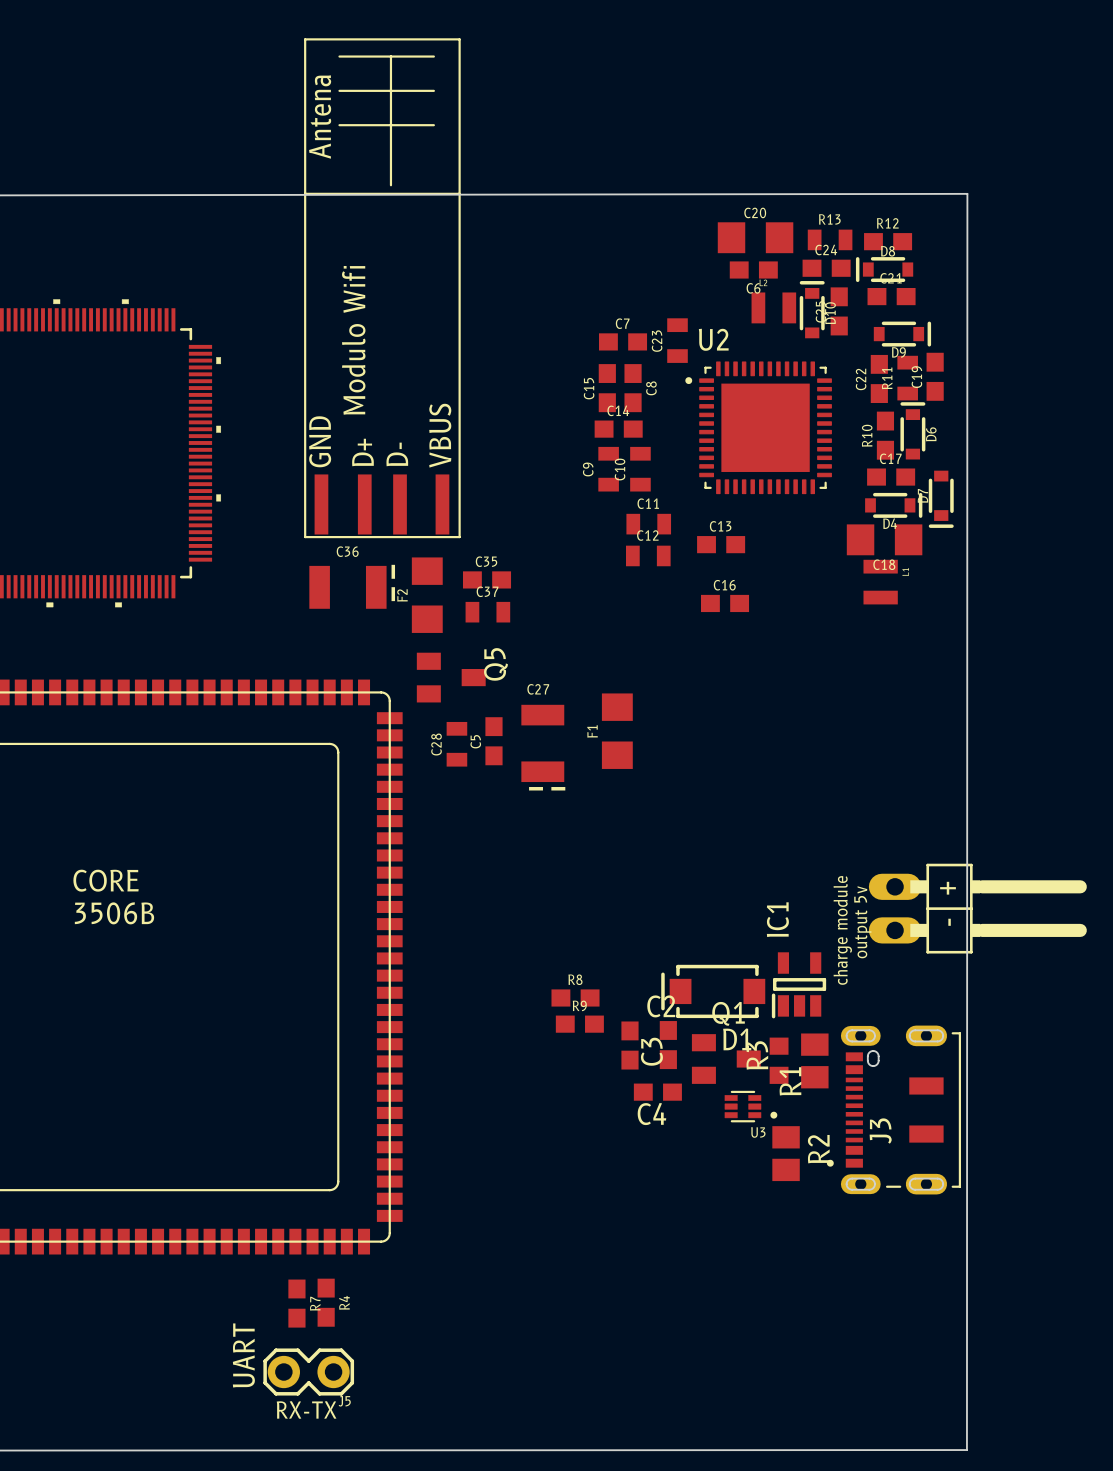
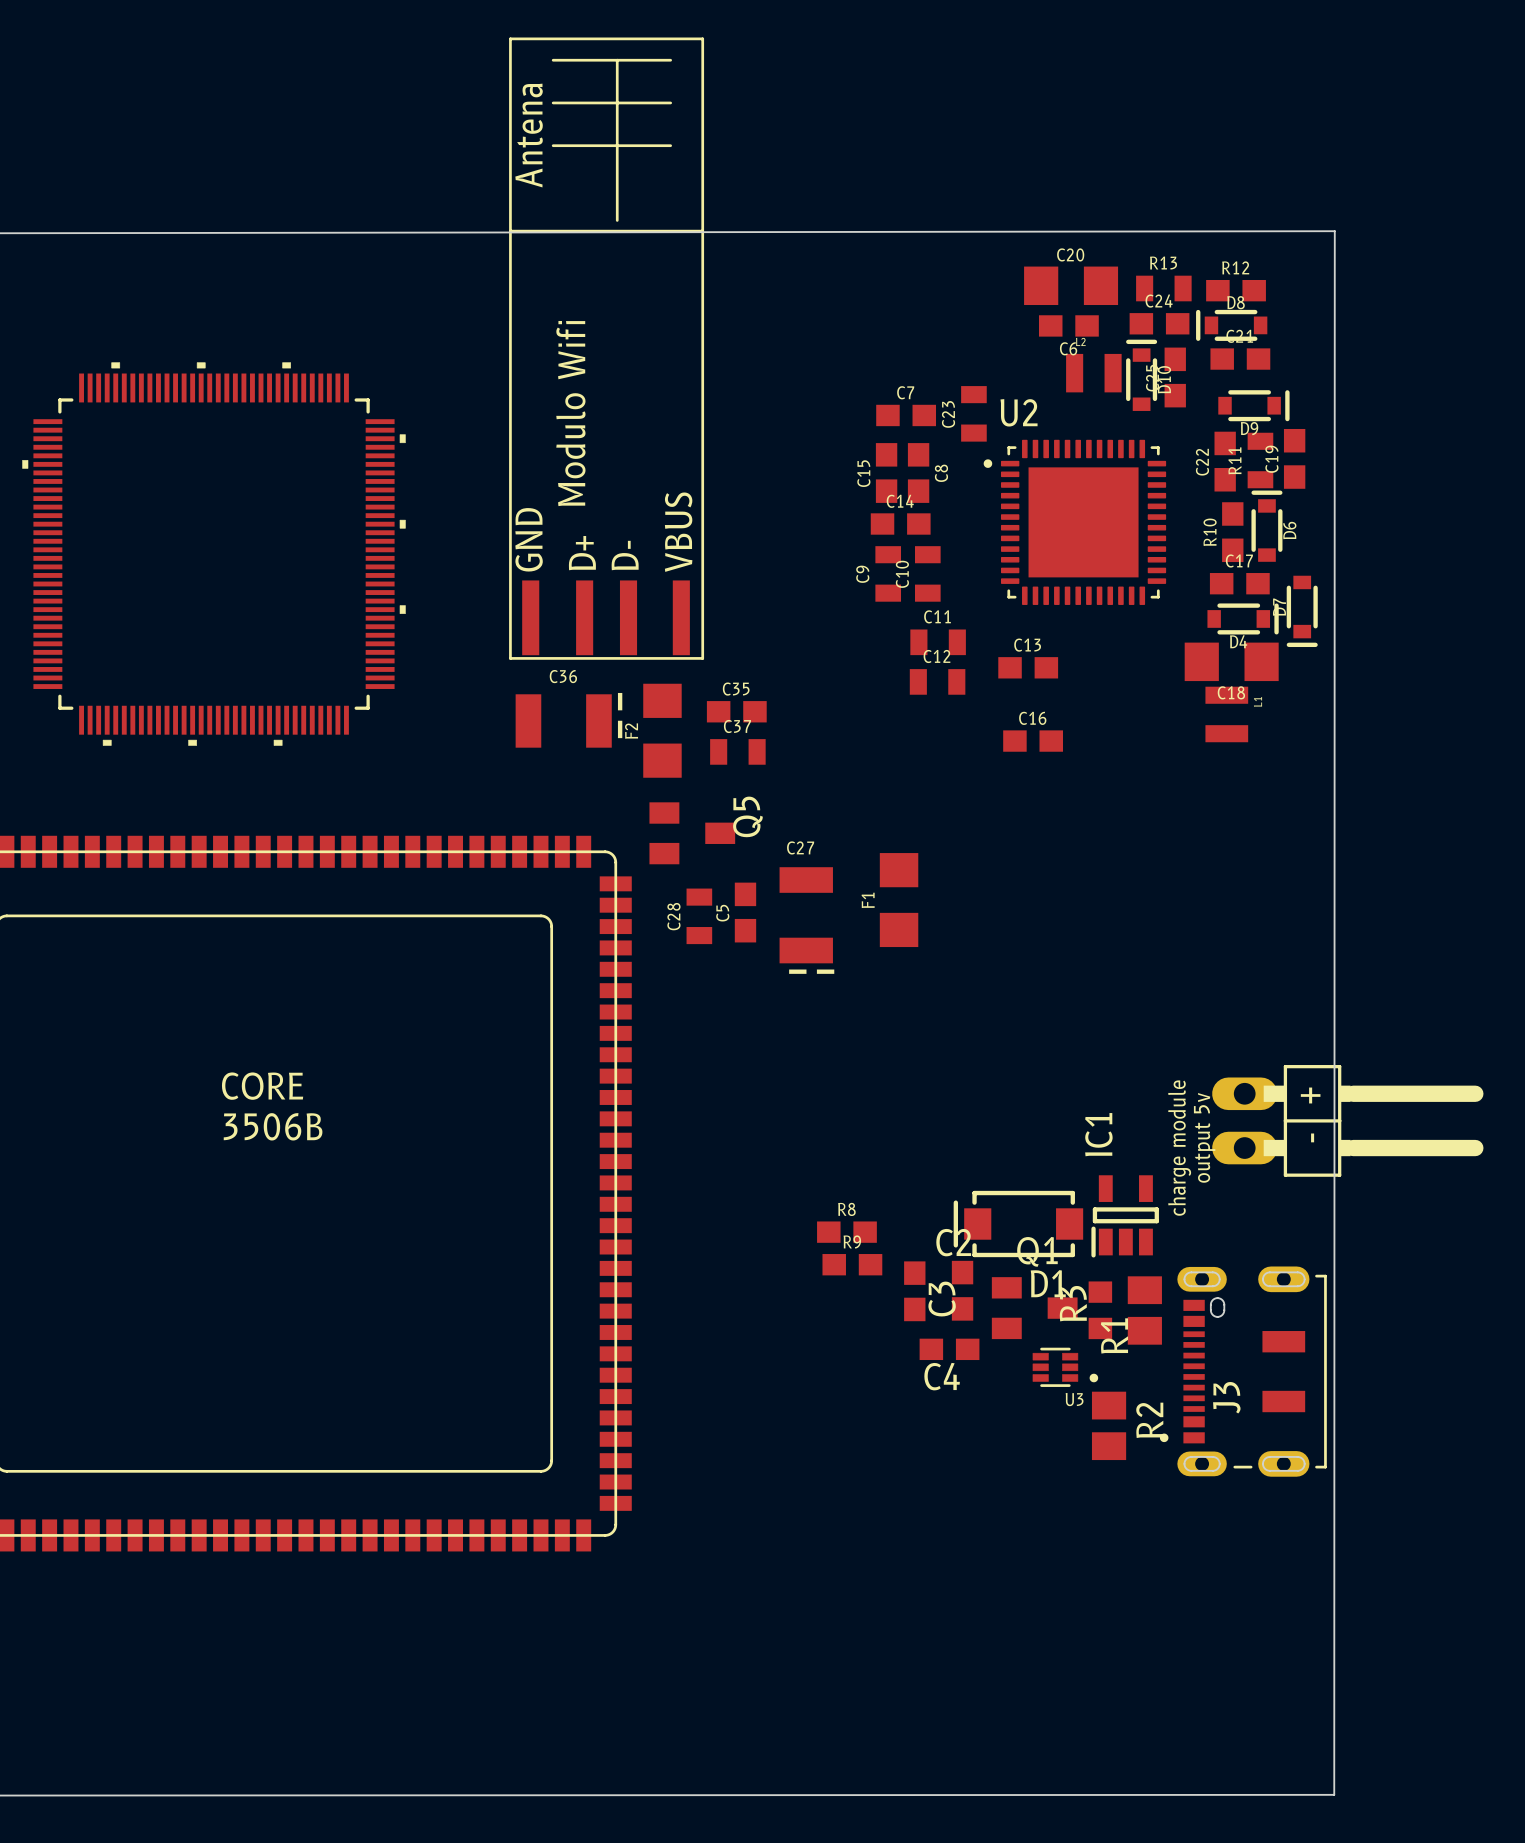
R4: (326, 1302) -> none
R7: (296, 1303) -> none
text: UART (243, 1355) -> none
J5: (308, 1372) -> none
text: RX-TX (306, 1409) -> none

